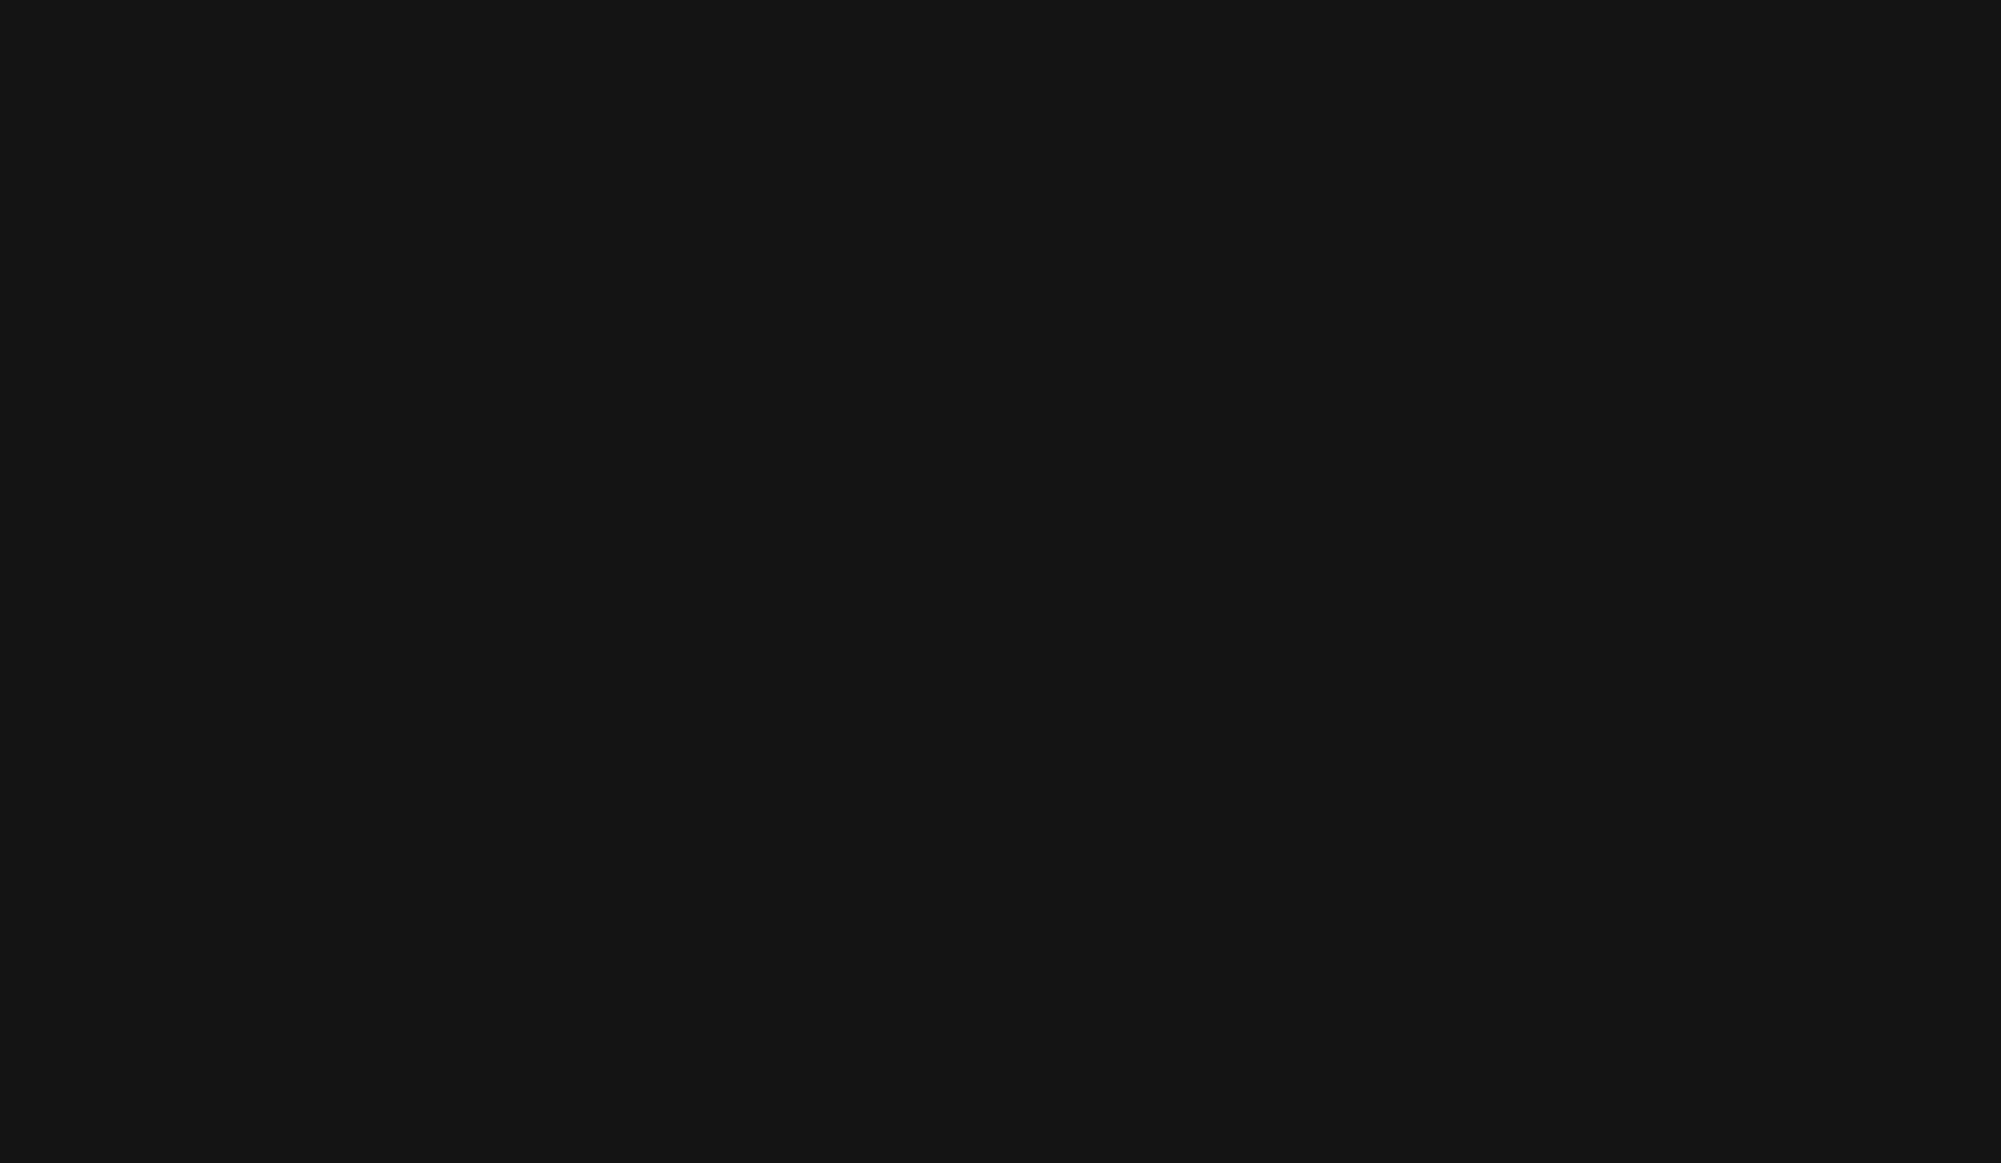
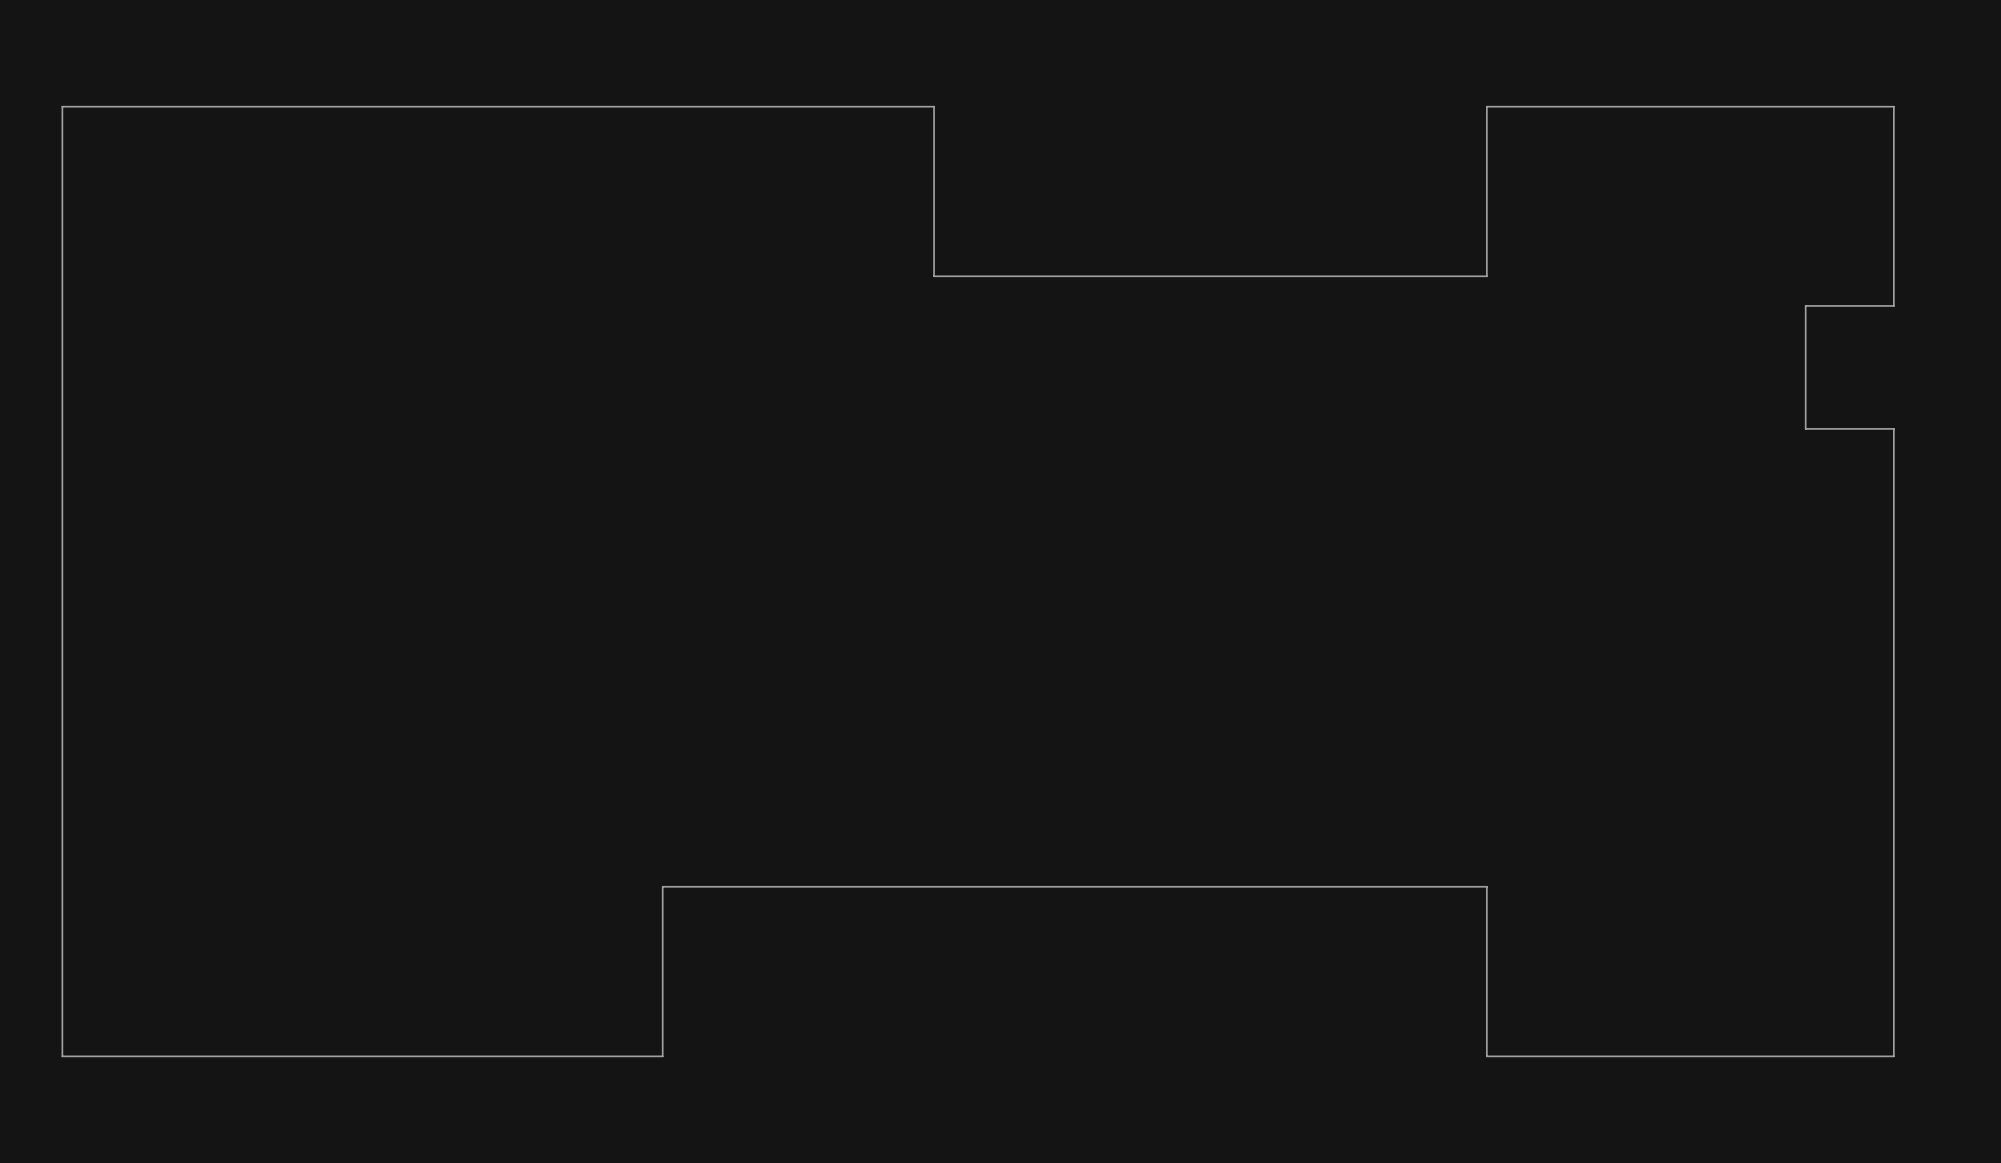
board edge: none -> (1893, 106) (1893, 305) (1805, 305) (1805, 428) (1893, 428) (1893, 1056) (1486, 1056) (1486, 886) (662, 886) (662, 1056) (62, 1056) (62, 106) (934, 106) (934, 276) (1486, 276) (1486, 106) (1893, 106)

